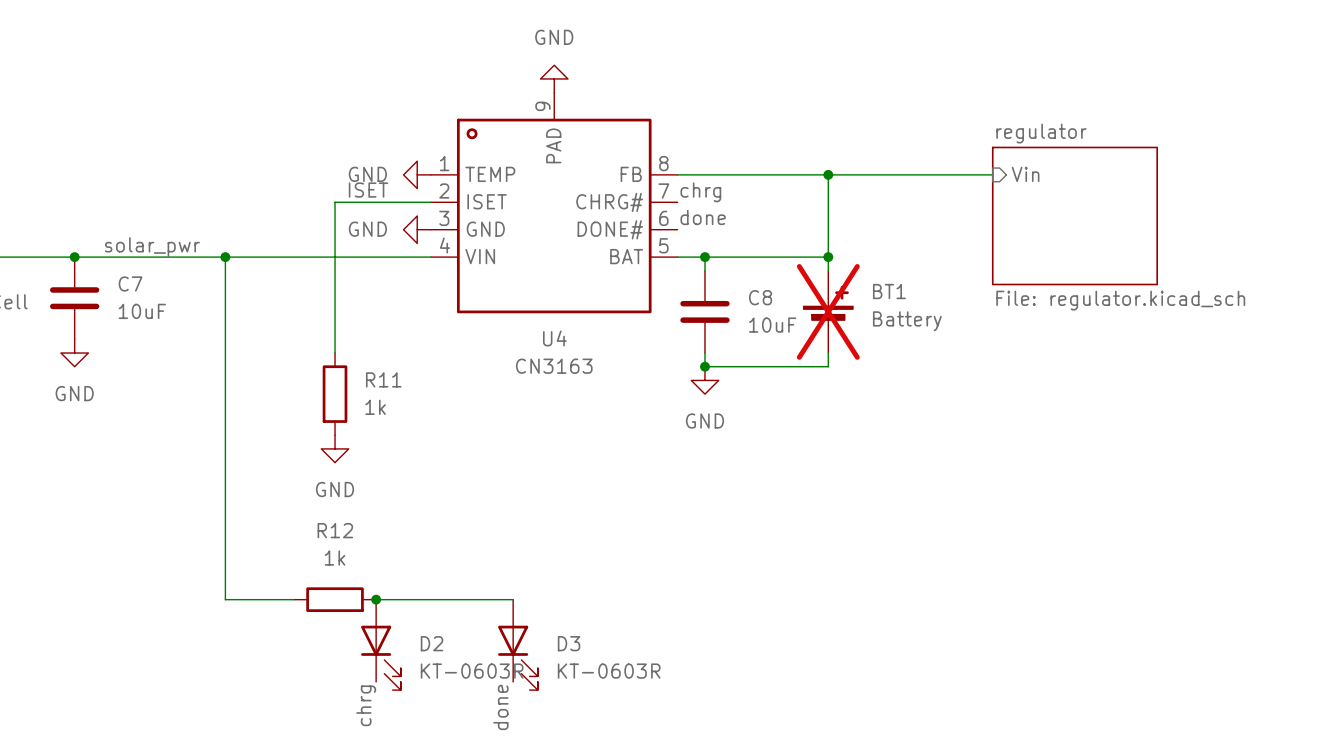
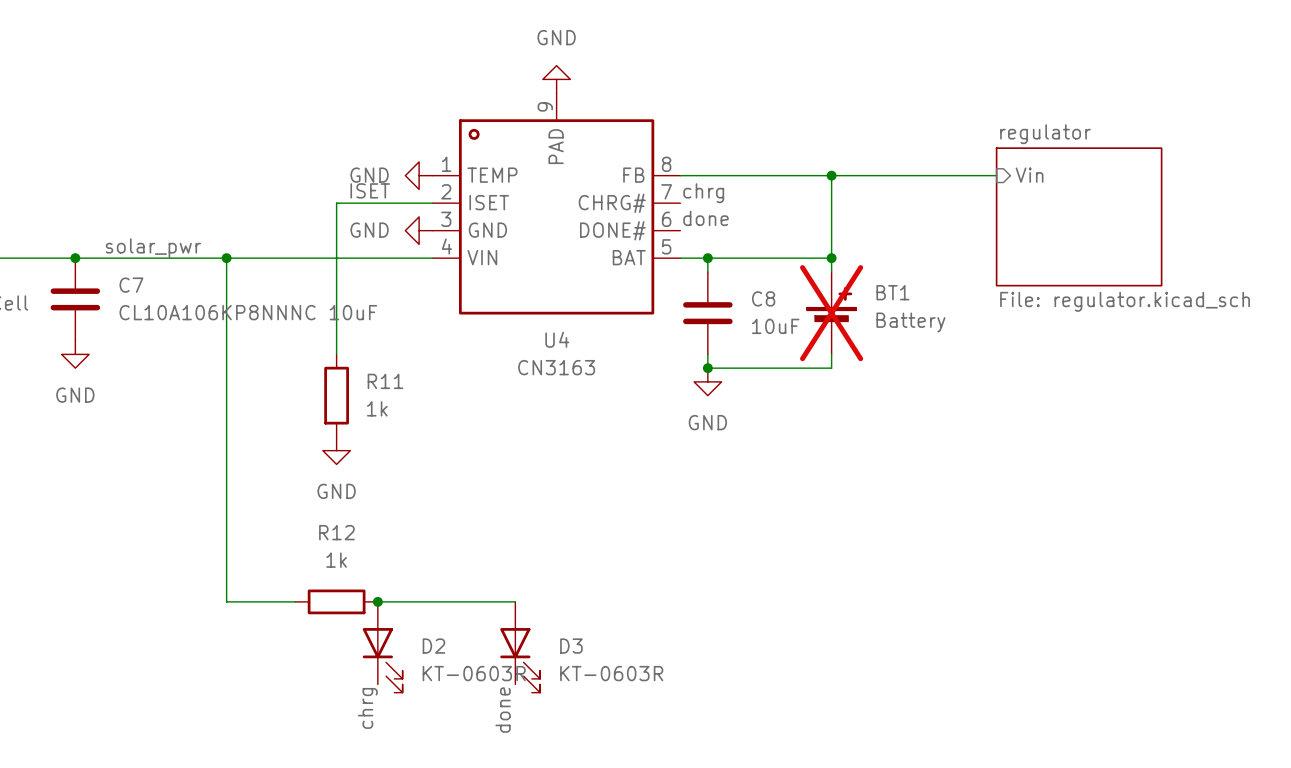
C7 value: 10uF (142, 311) -> CL10A106KP8NNNC 10uF (248, 312)

